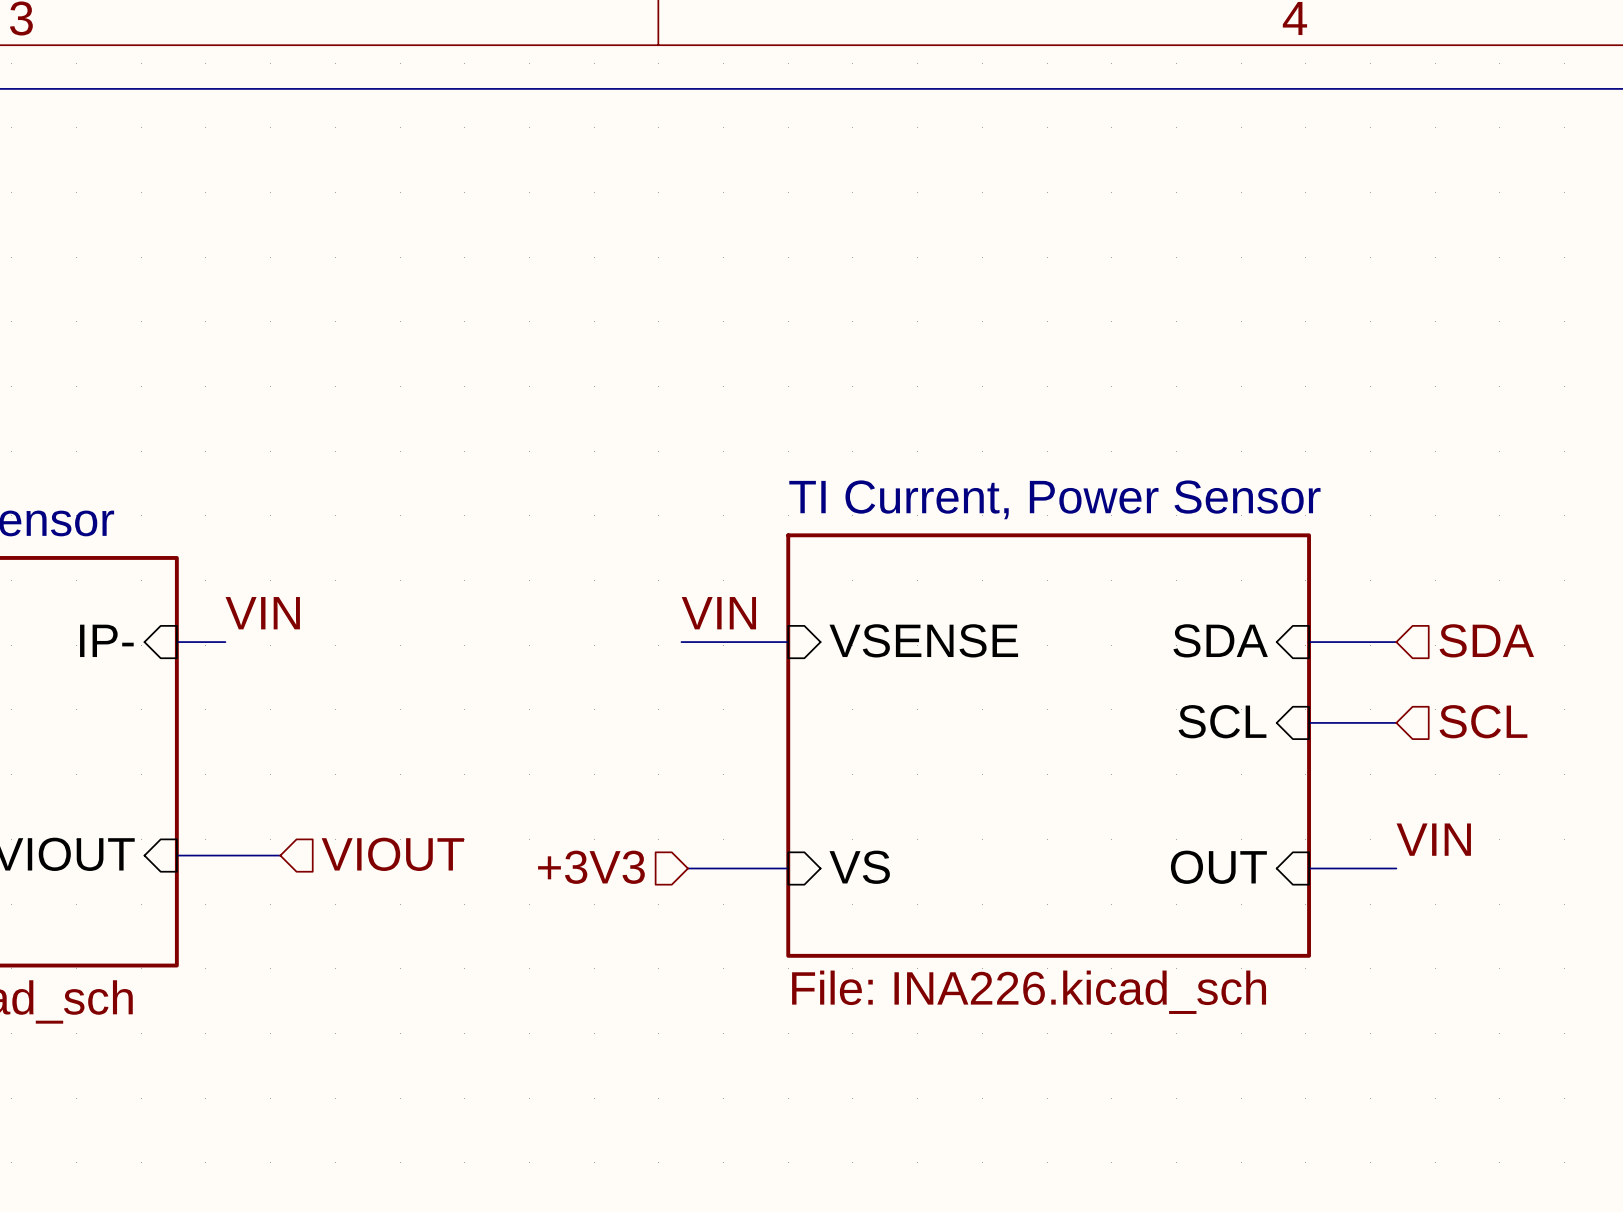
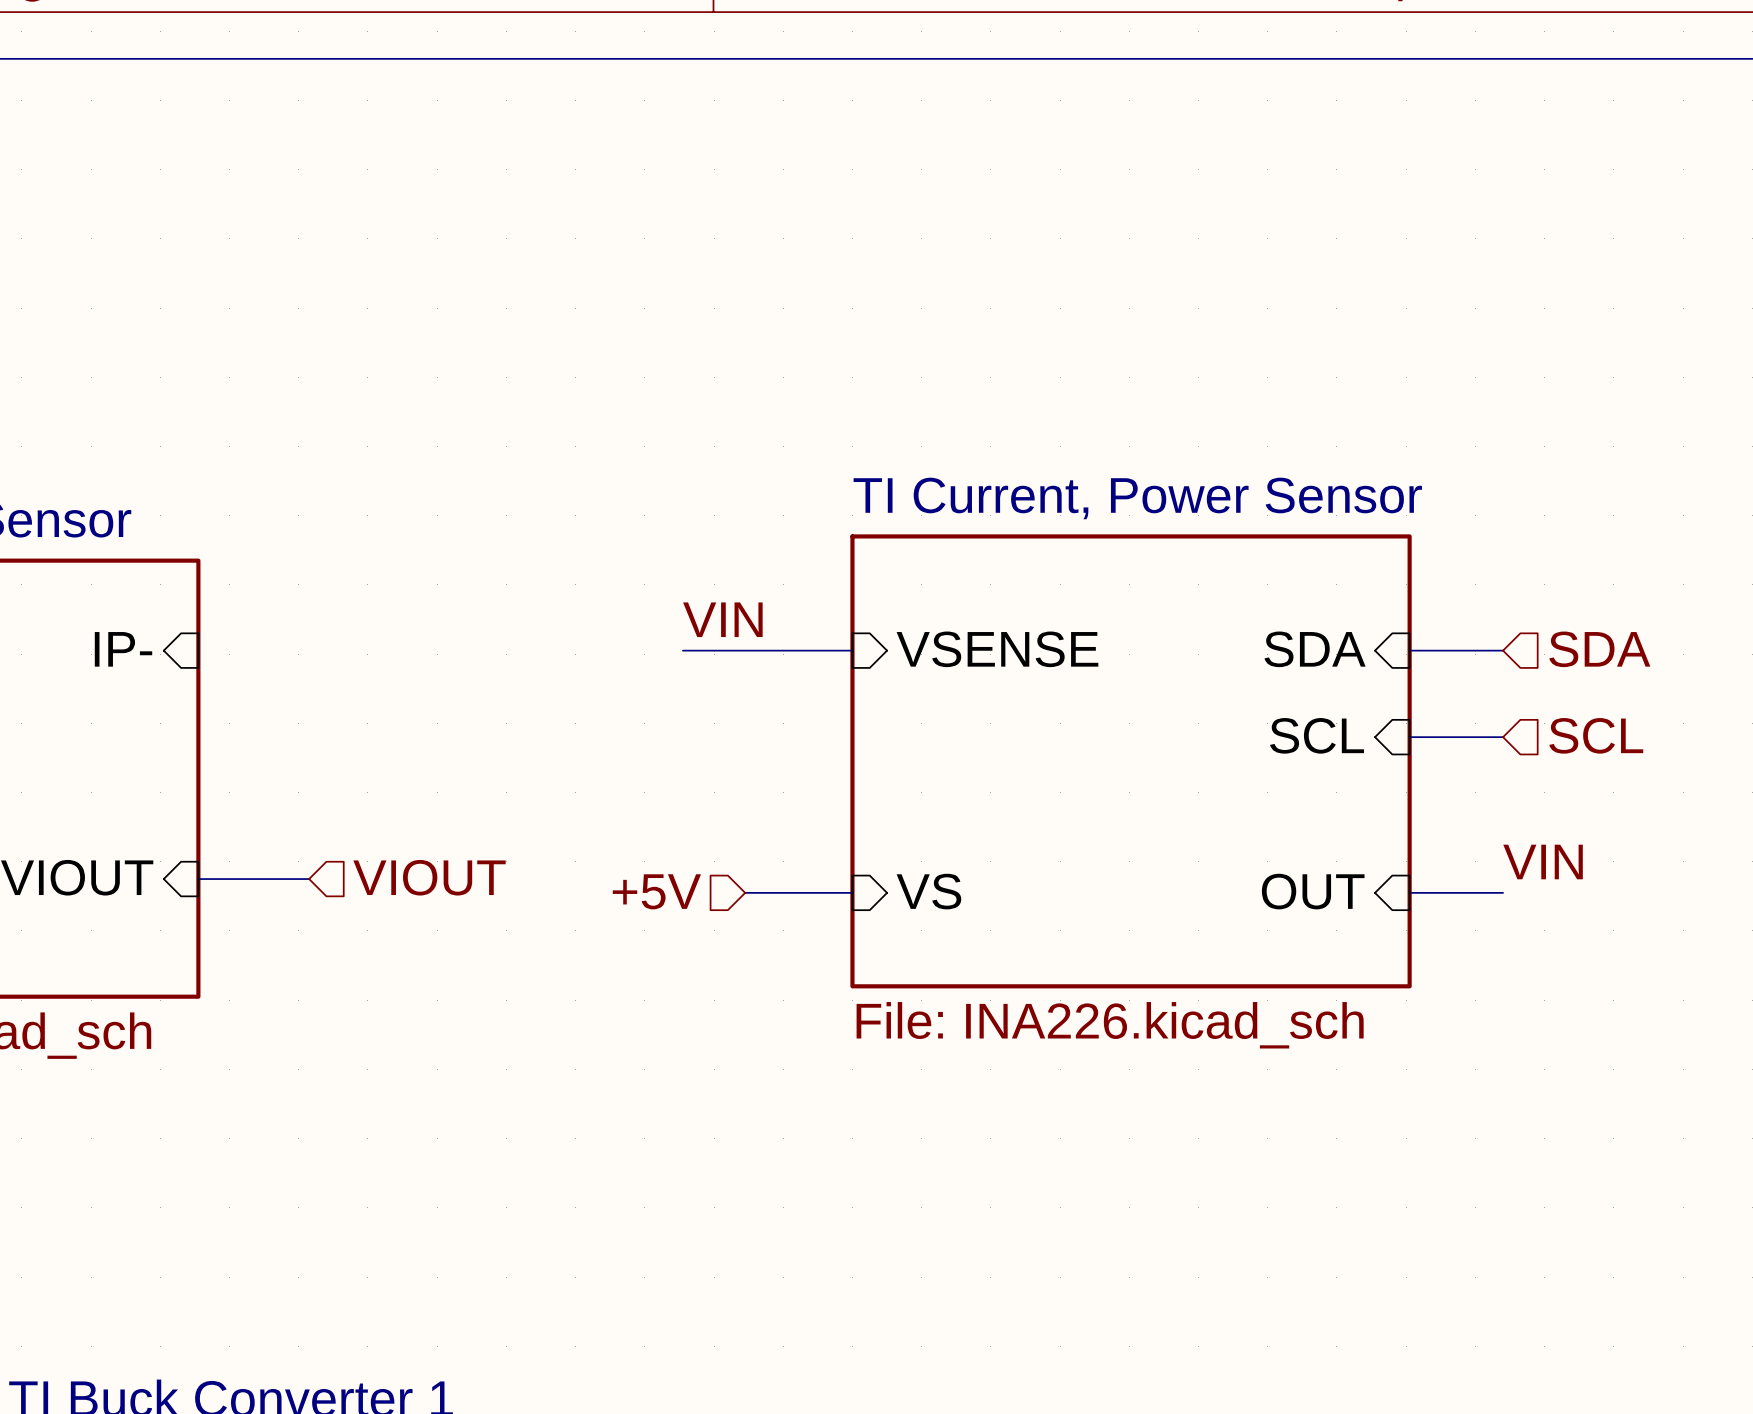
label: VIN (262, 613) -> none
label position: VIN (718, 613) -> VIN (722, 619)
wire: (176, 642) (225, 642) -> none
wire: none -> (682, 650) (738, 650)
hierarchical label: +3V3 (591, 867) -> +5V (656, 891)

